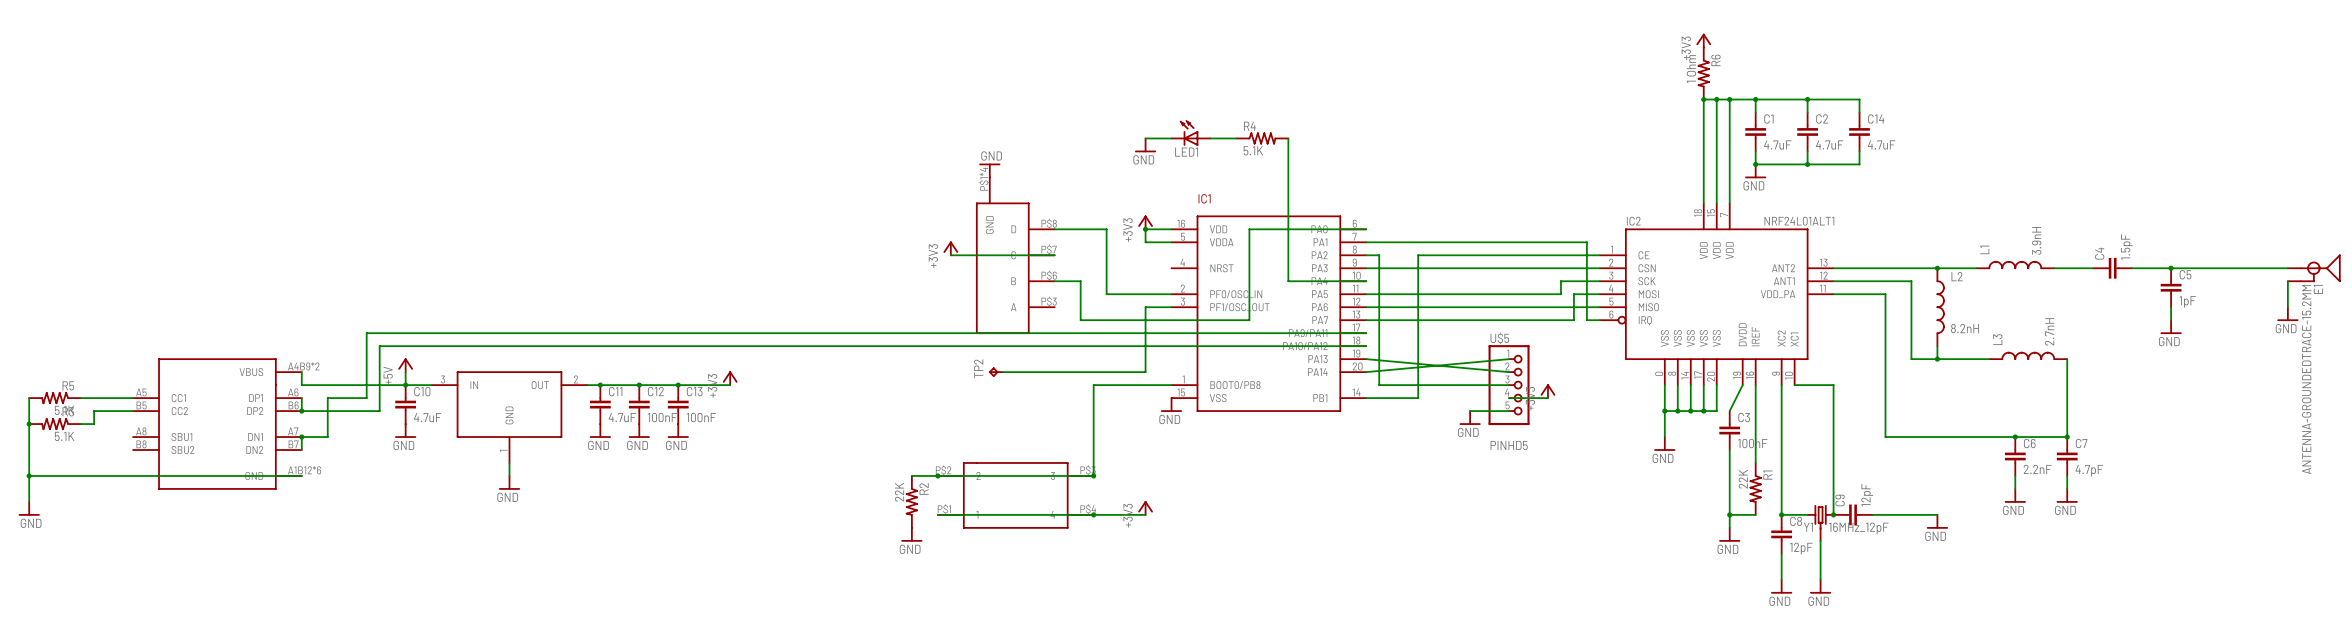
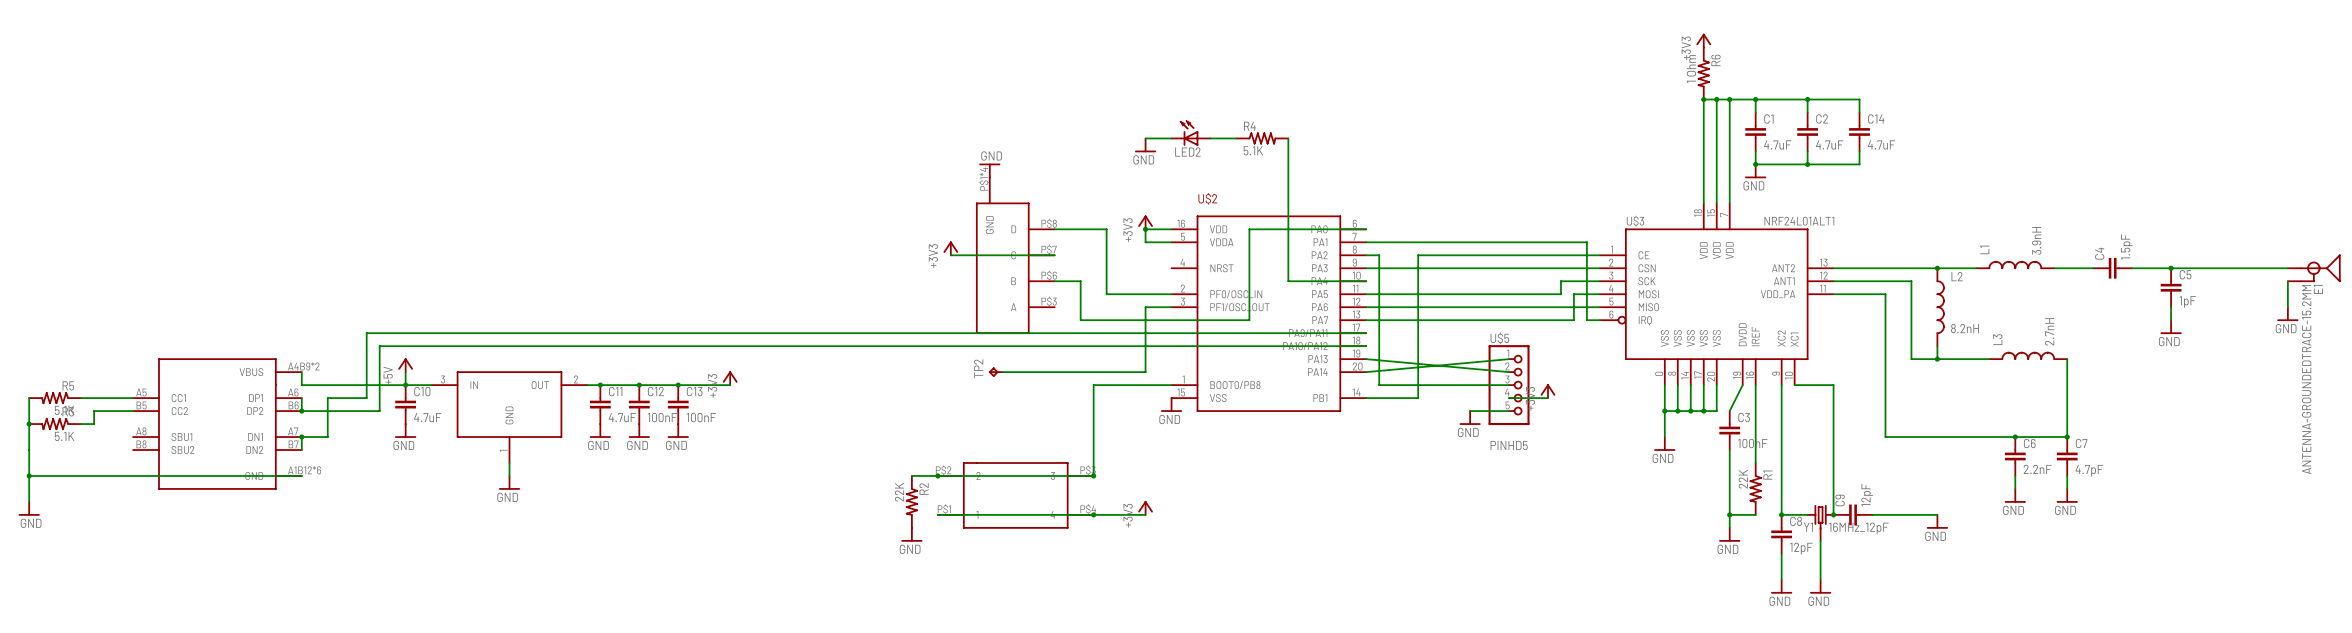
LED1 name: LED1 (1186, 152) -> LED2 (1187, 152)
IC1 name: IC1 (1204, 198) -> U$2 (1207, 198)
IC2 name: IC2 (1633, 221) -> U$3 (1635, 221)

